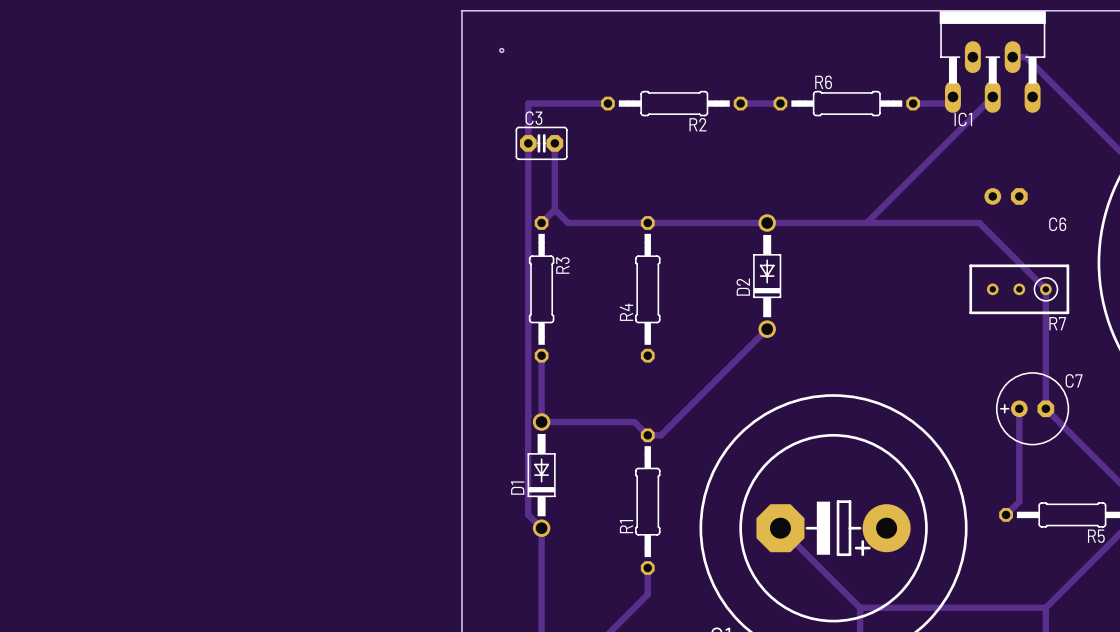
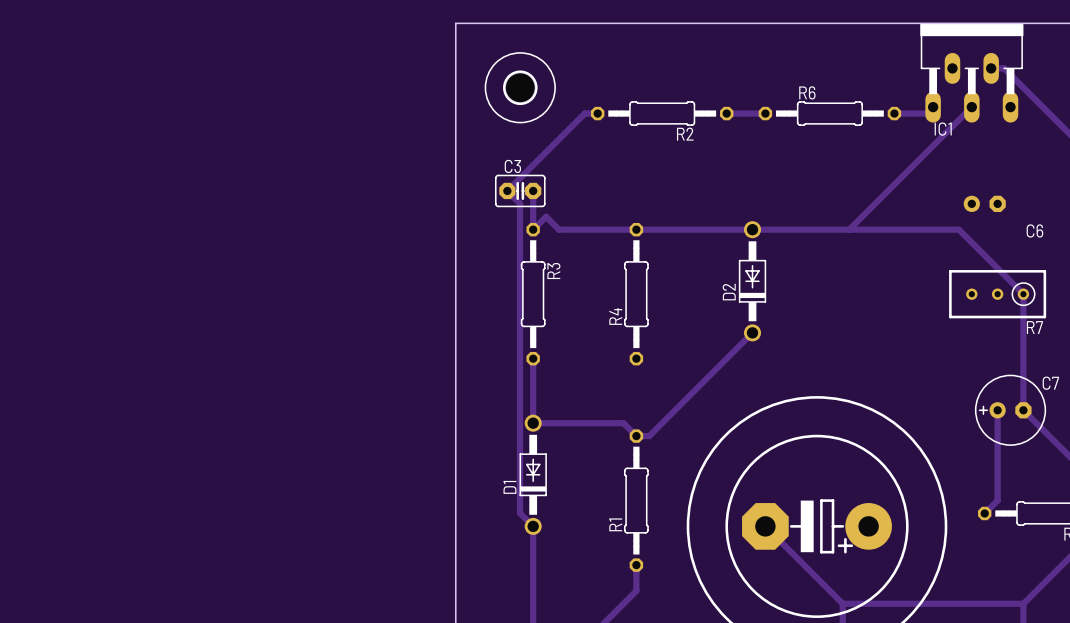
hole: (501, 50) -> none
part: none -> (520, 87)
track: (594, 103) (528, 103) (528, 416) -> (584, 113) (507, 190) (520, 203) (520, 417)
C3 position: (541, 143) -> (520, 190)
track: (554, 143) (554, 209) -> none
track: none -> (533, 190) (533, 229)

